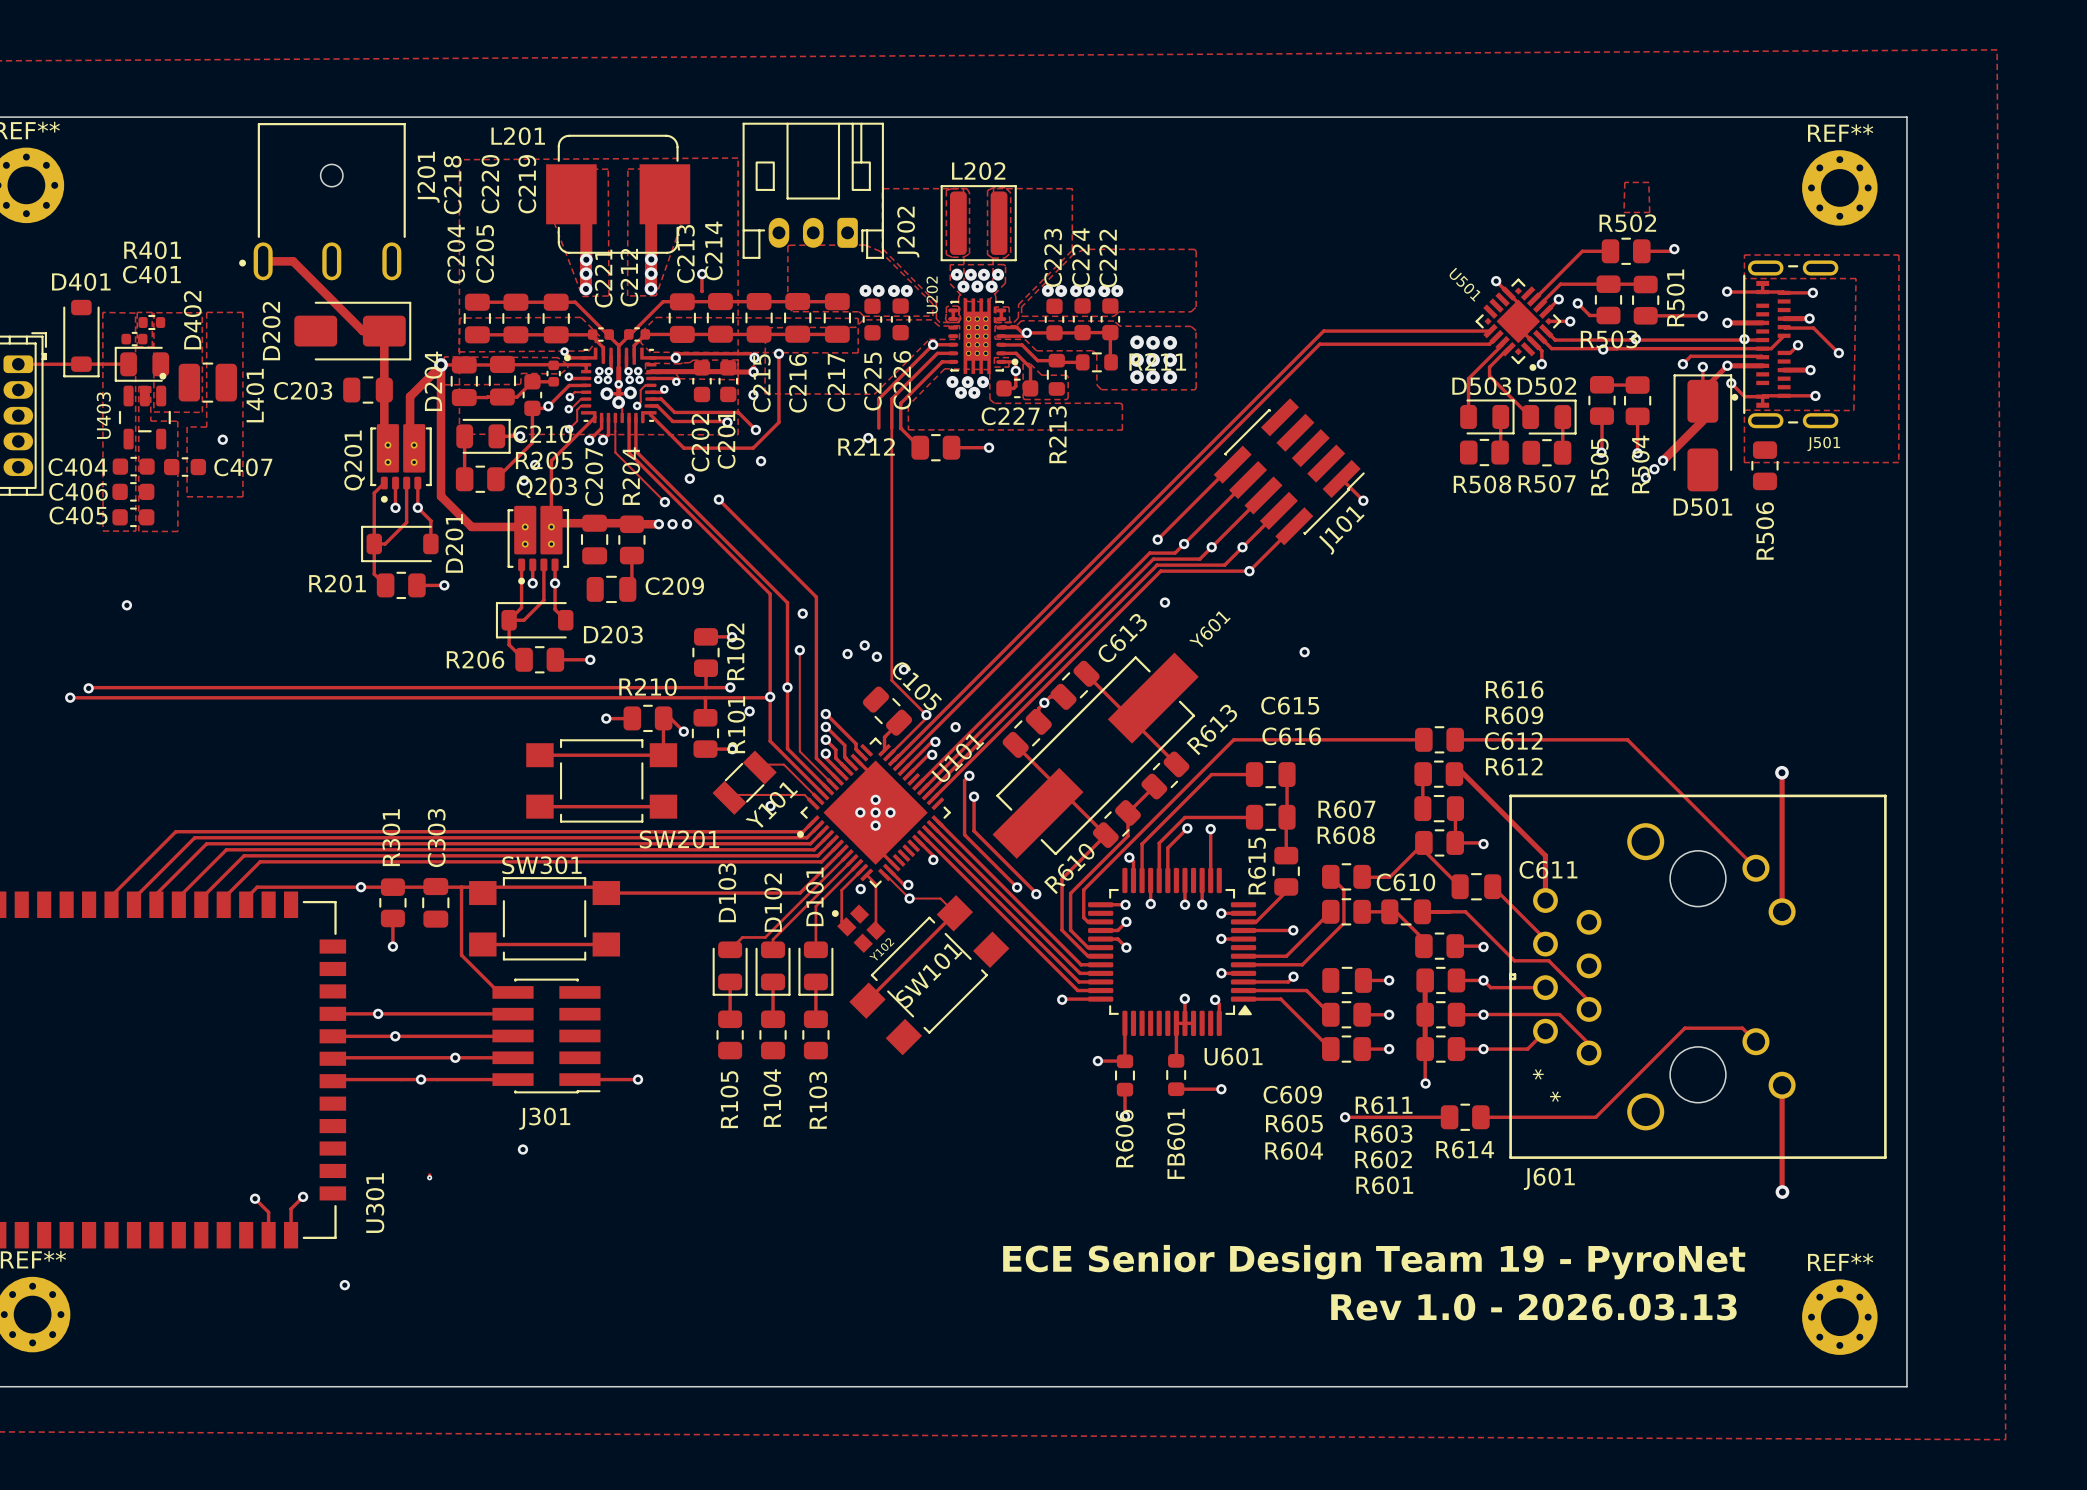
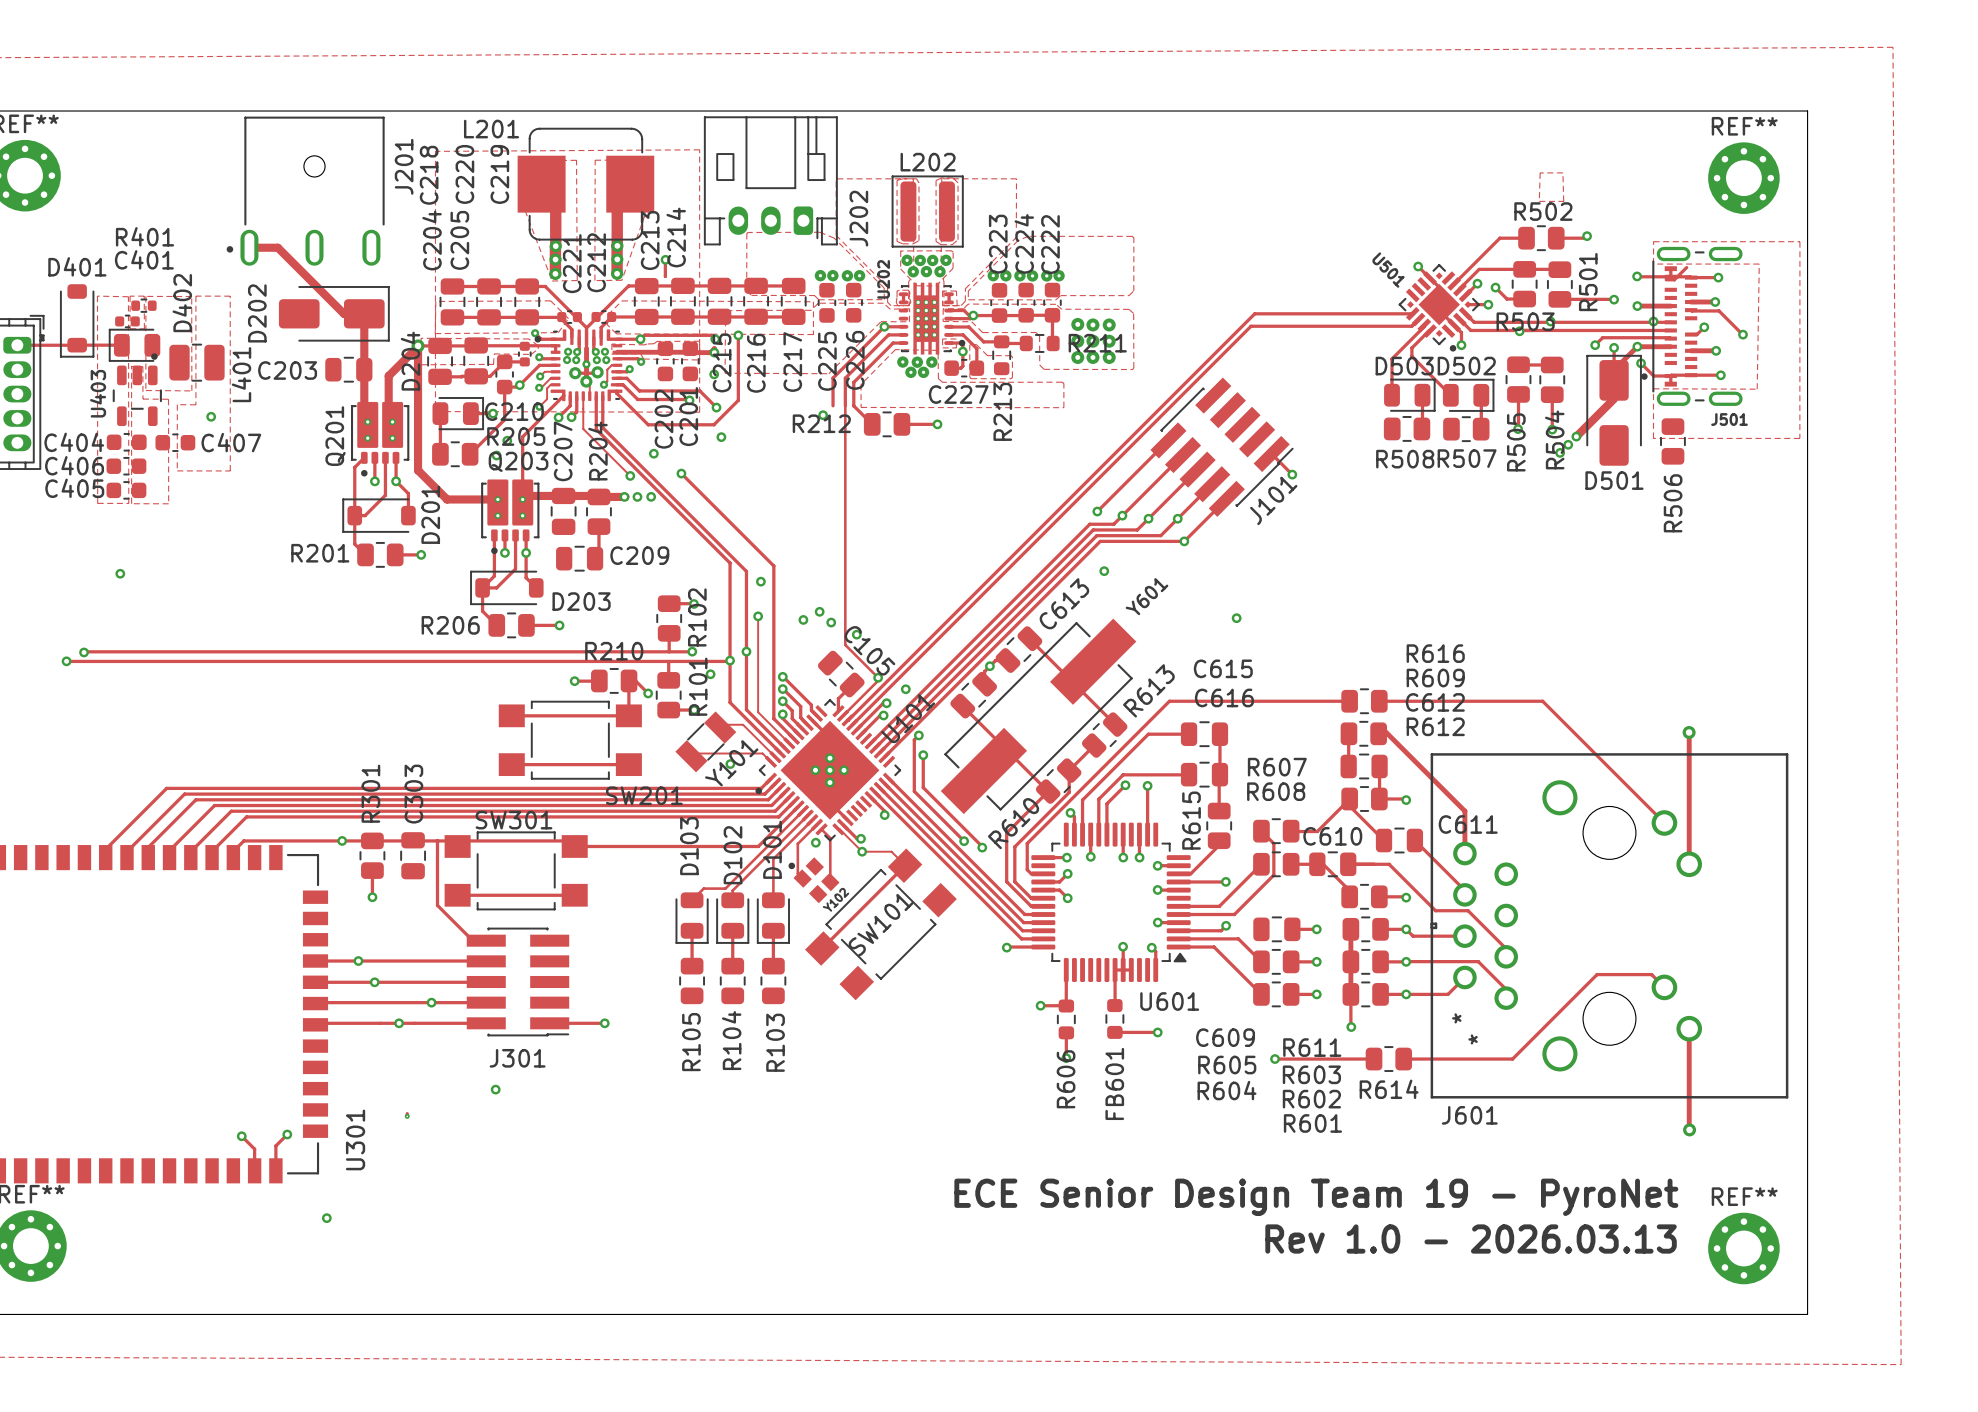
track: (1784, 335) (1771, 348) (1762, 348) -> (1686, 267) (1674, 279) (1666, 279)

